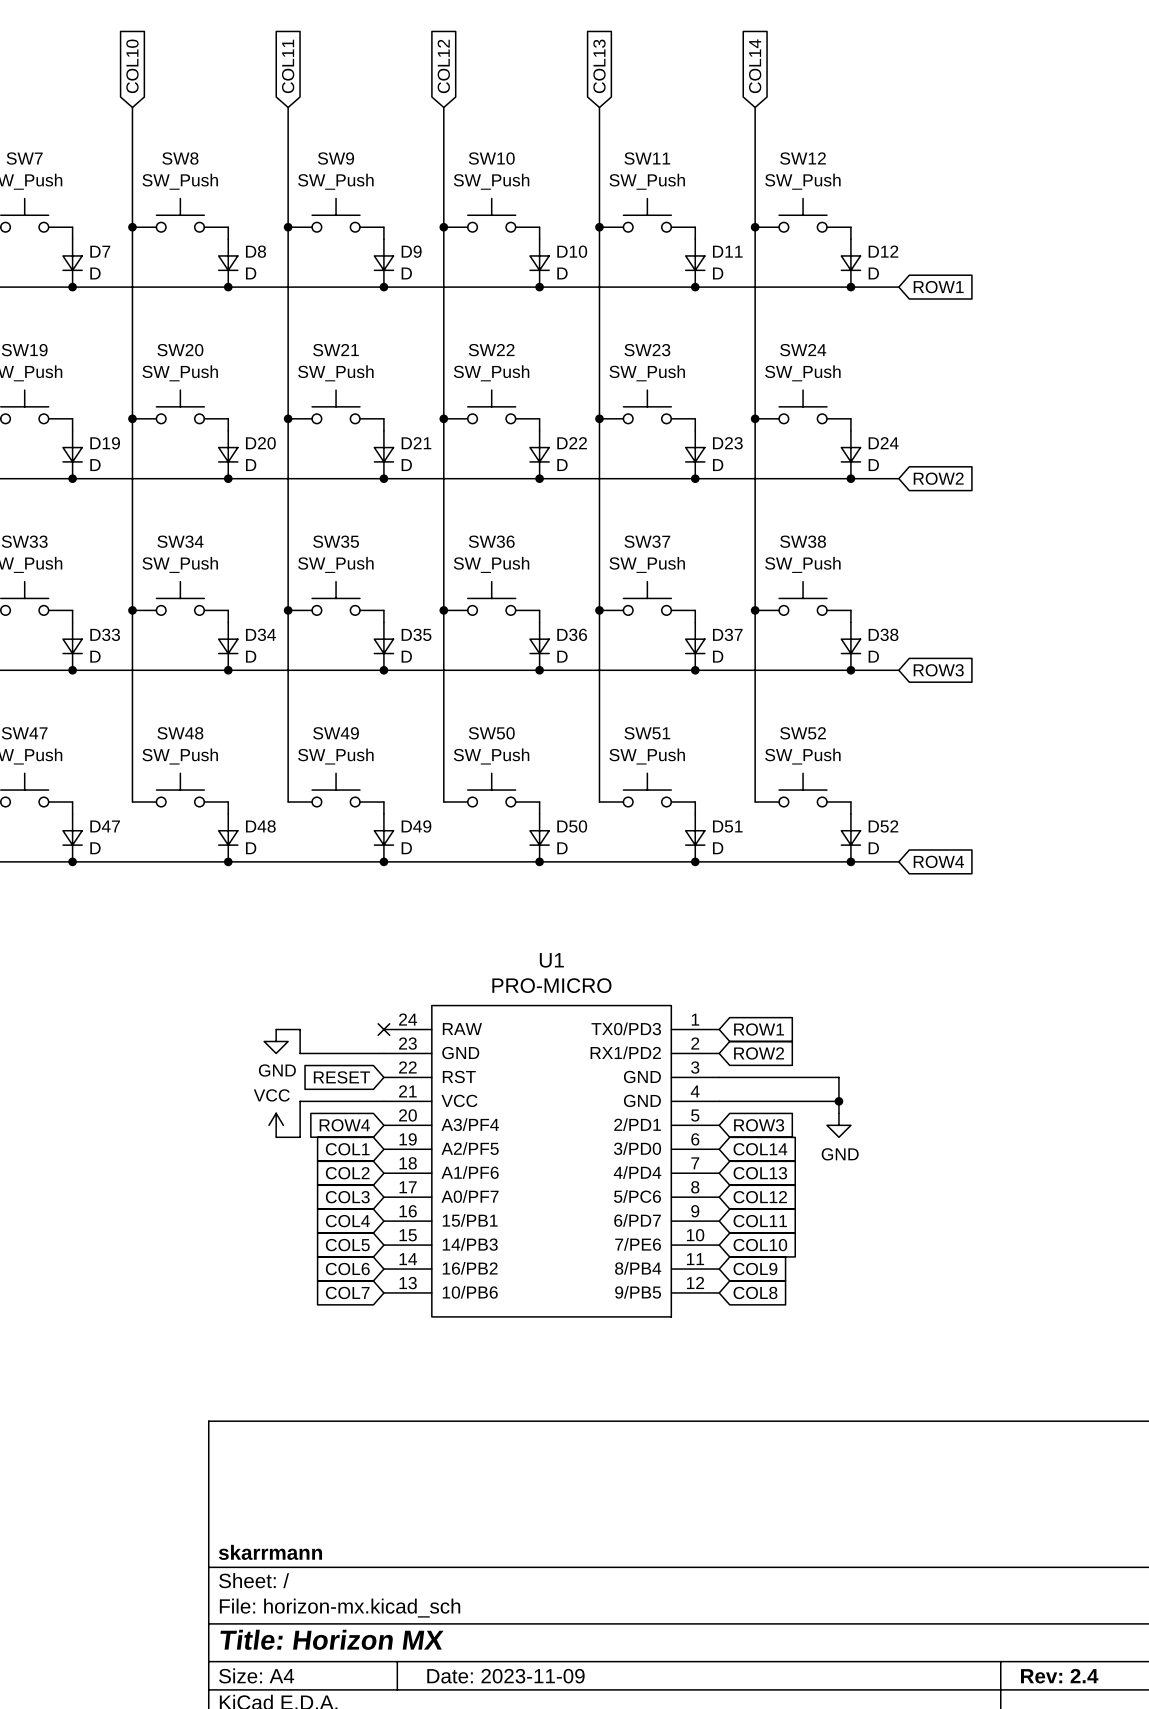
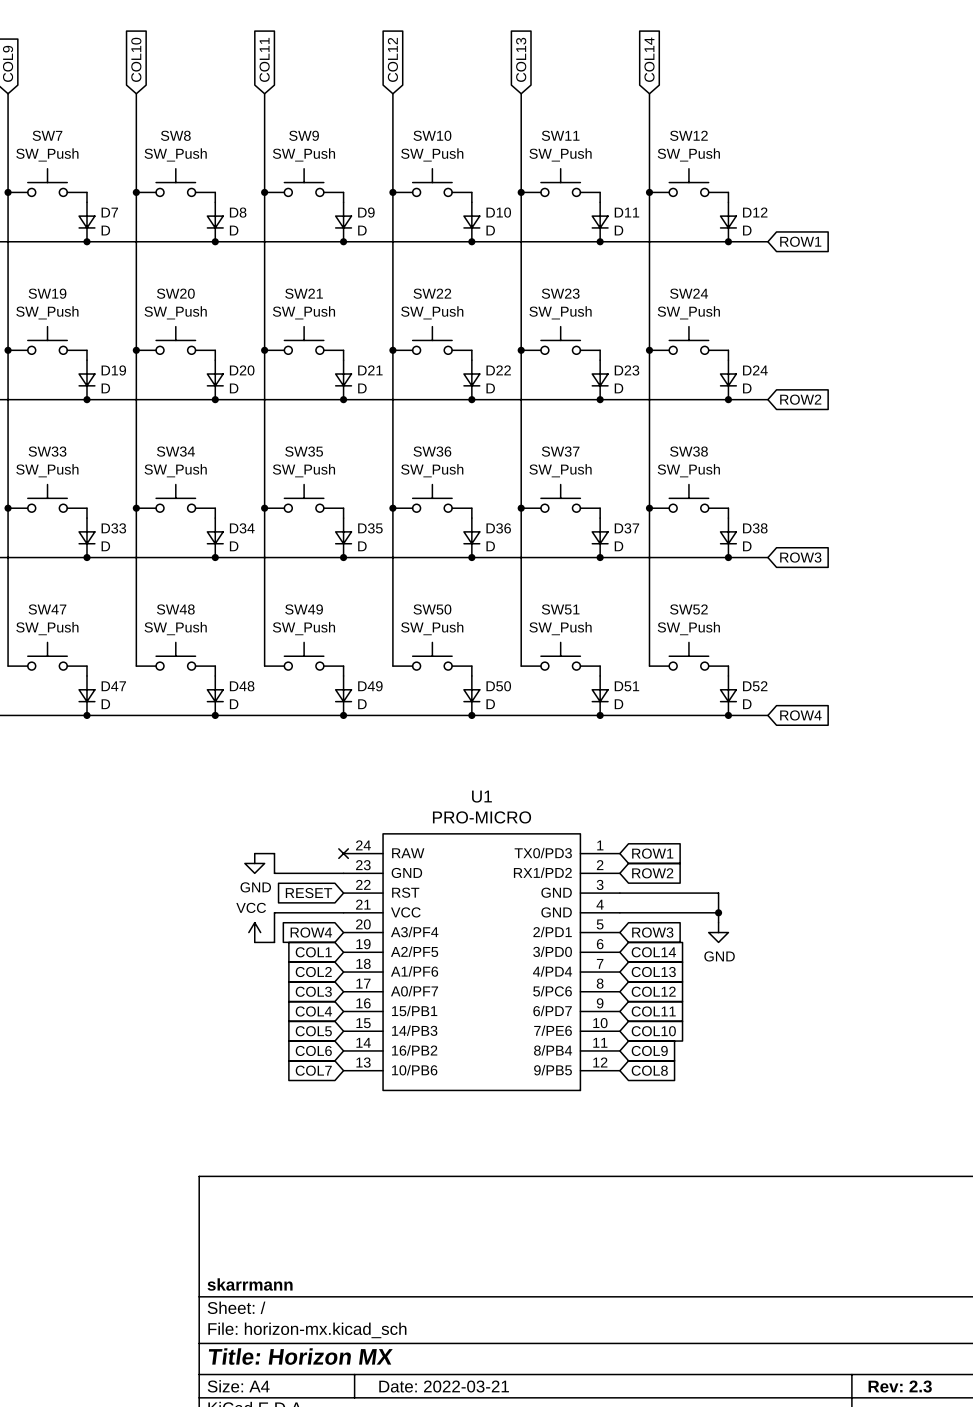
title block: Date: 2023-11-09 (505, 1676) -> Date: 2022-03-21 (444, 1386)
title block: Rev: 2.4 (1059, 1676) -> Rev: 2.3 (900, 1386)

